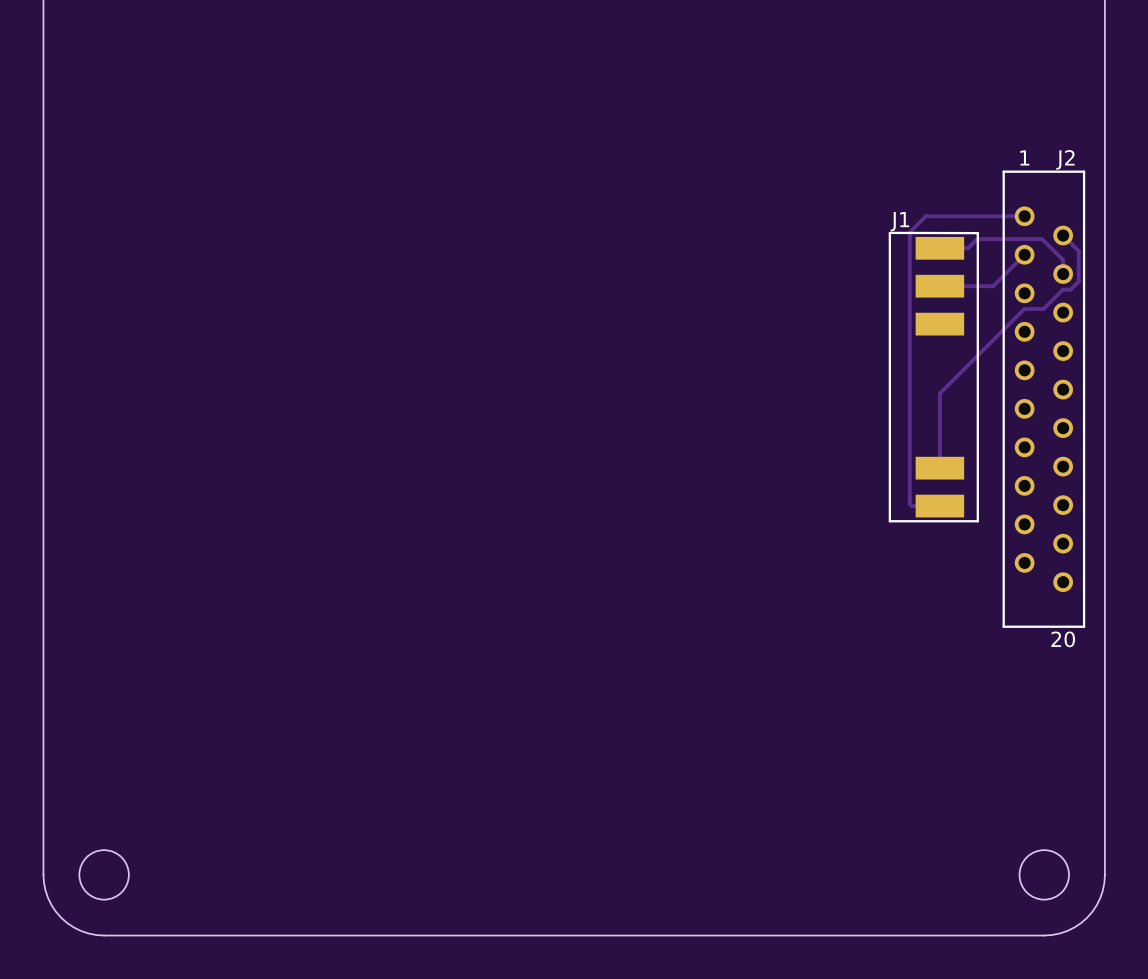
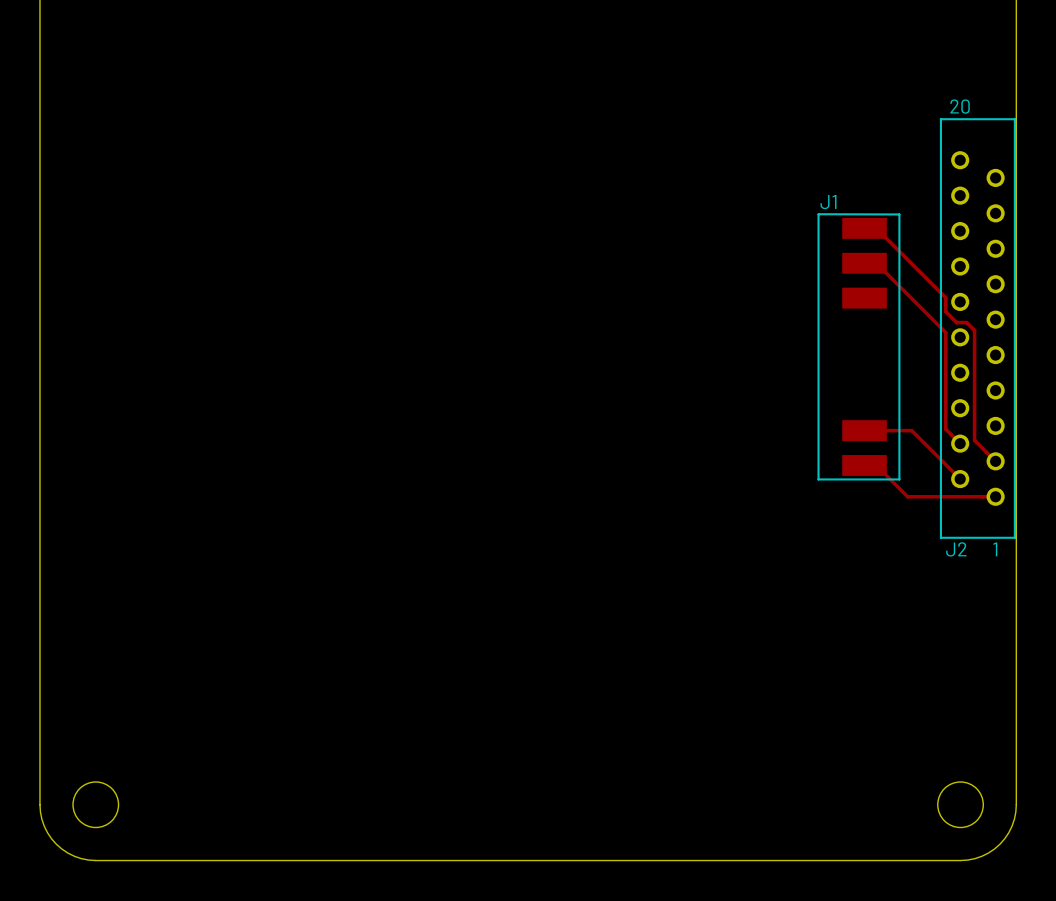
track: (1024, 216) (925, 216) (909, 232) (909, 504) (911, 506) (939, 506) -> (995, 496) (907, 496) (876, 465) (864, 465)
track: (1063, 235) (1078, 251) (1078, 281) (1070, 289) (1062, 289) (1043, 308) (1024, 308) (939, 393) (939, 468) -> (960, 479) (911, 430) (864, 430)
track: (952, 248) (968, 248) (977, 239) (1042, 239) (1063, 260) (1063, 274) -> (876, 228) (945, 297) (945, 311) (956, 322) (966, 322) (974, 330) (974, 440) (995, 461)
track: (1024, 254) (993, 286) (952, 286) -> (960, 443) (945, 429) (945, 332) (876, 263)
J2 rotation: 0° (1043, 399) -> 180° (977, 328)

